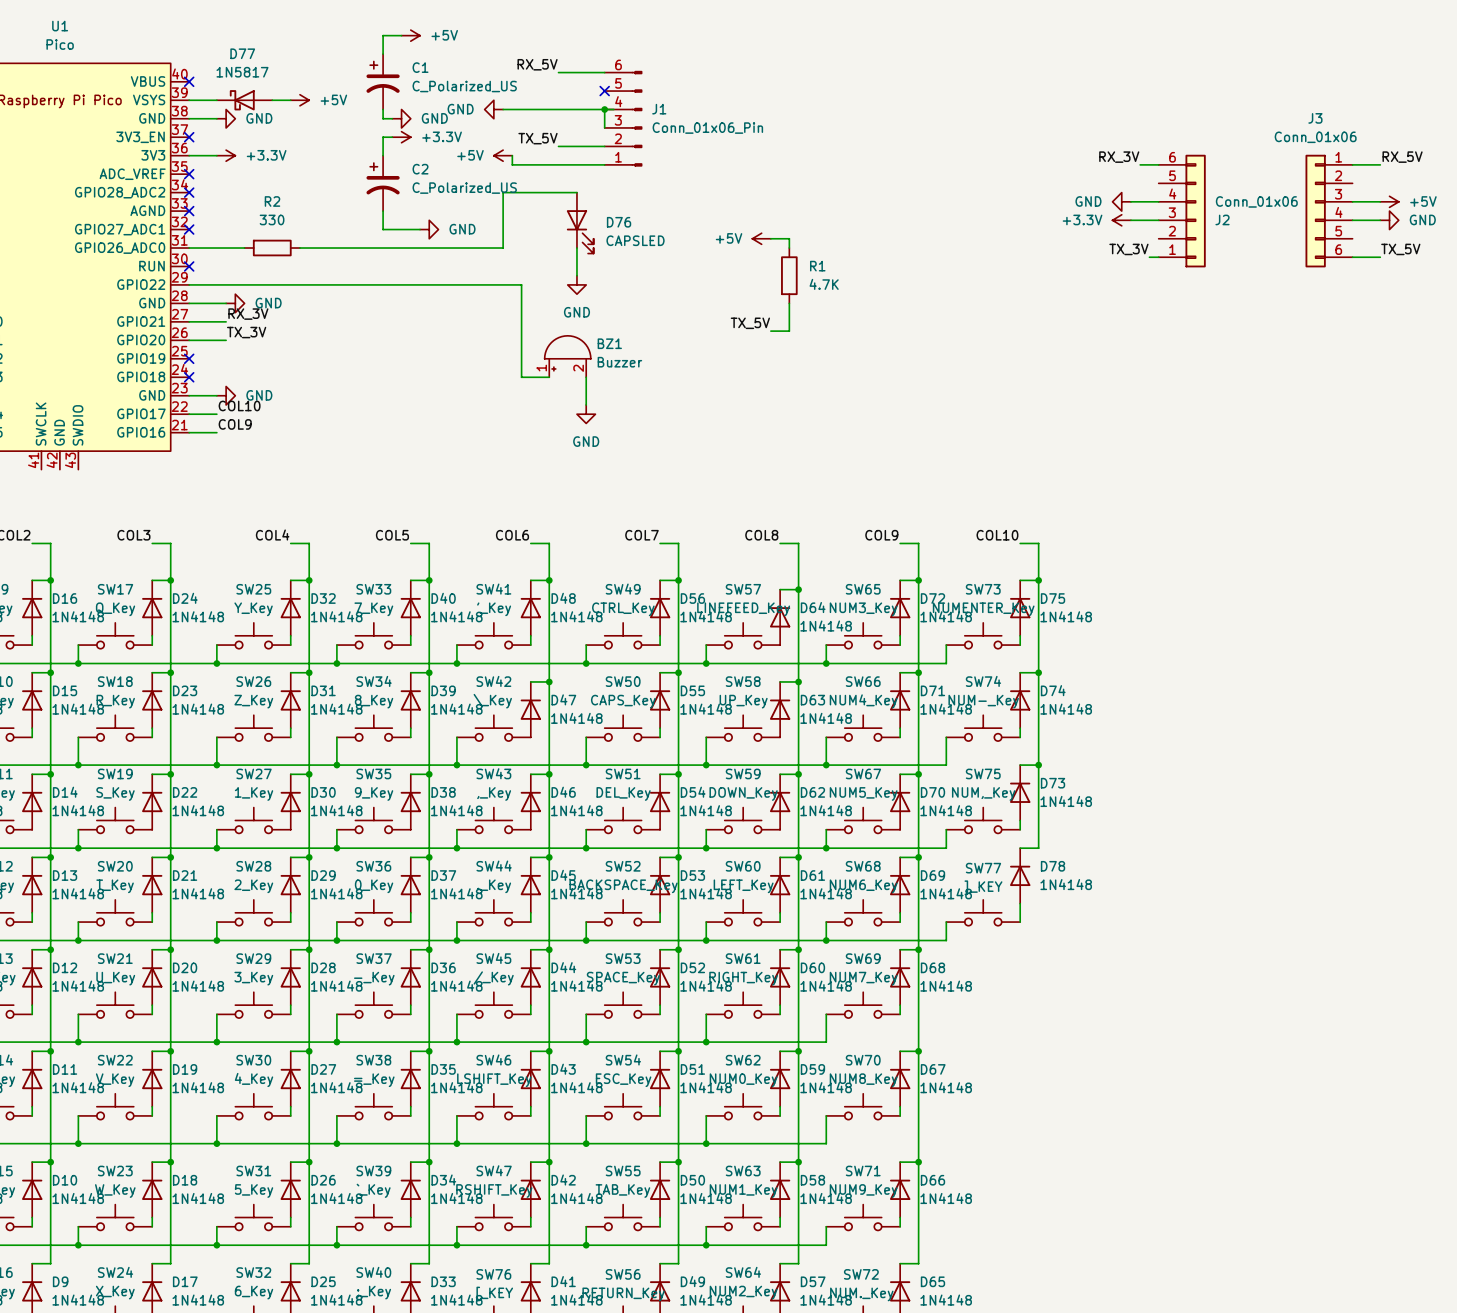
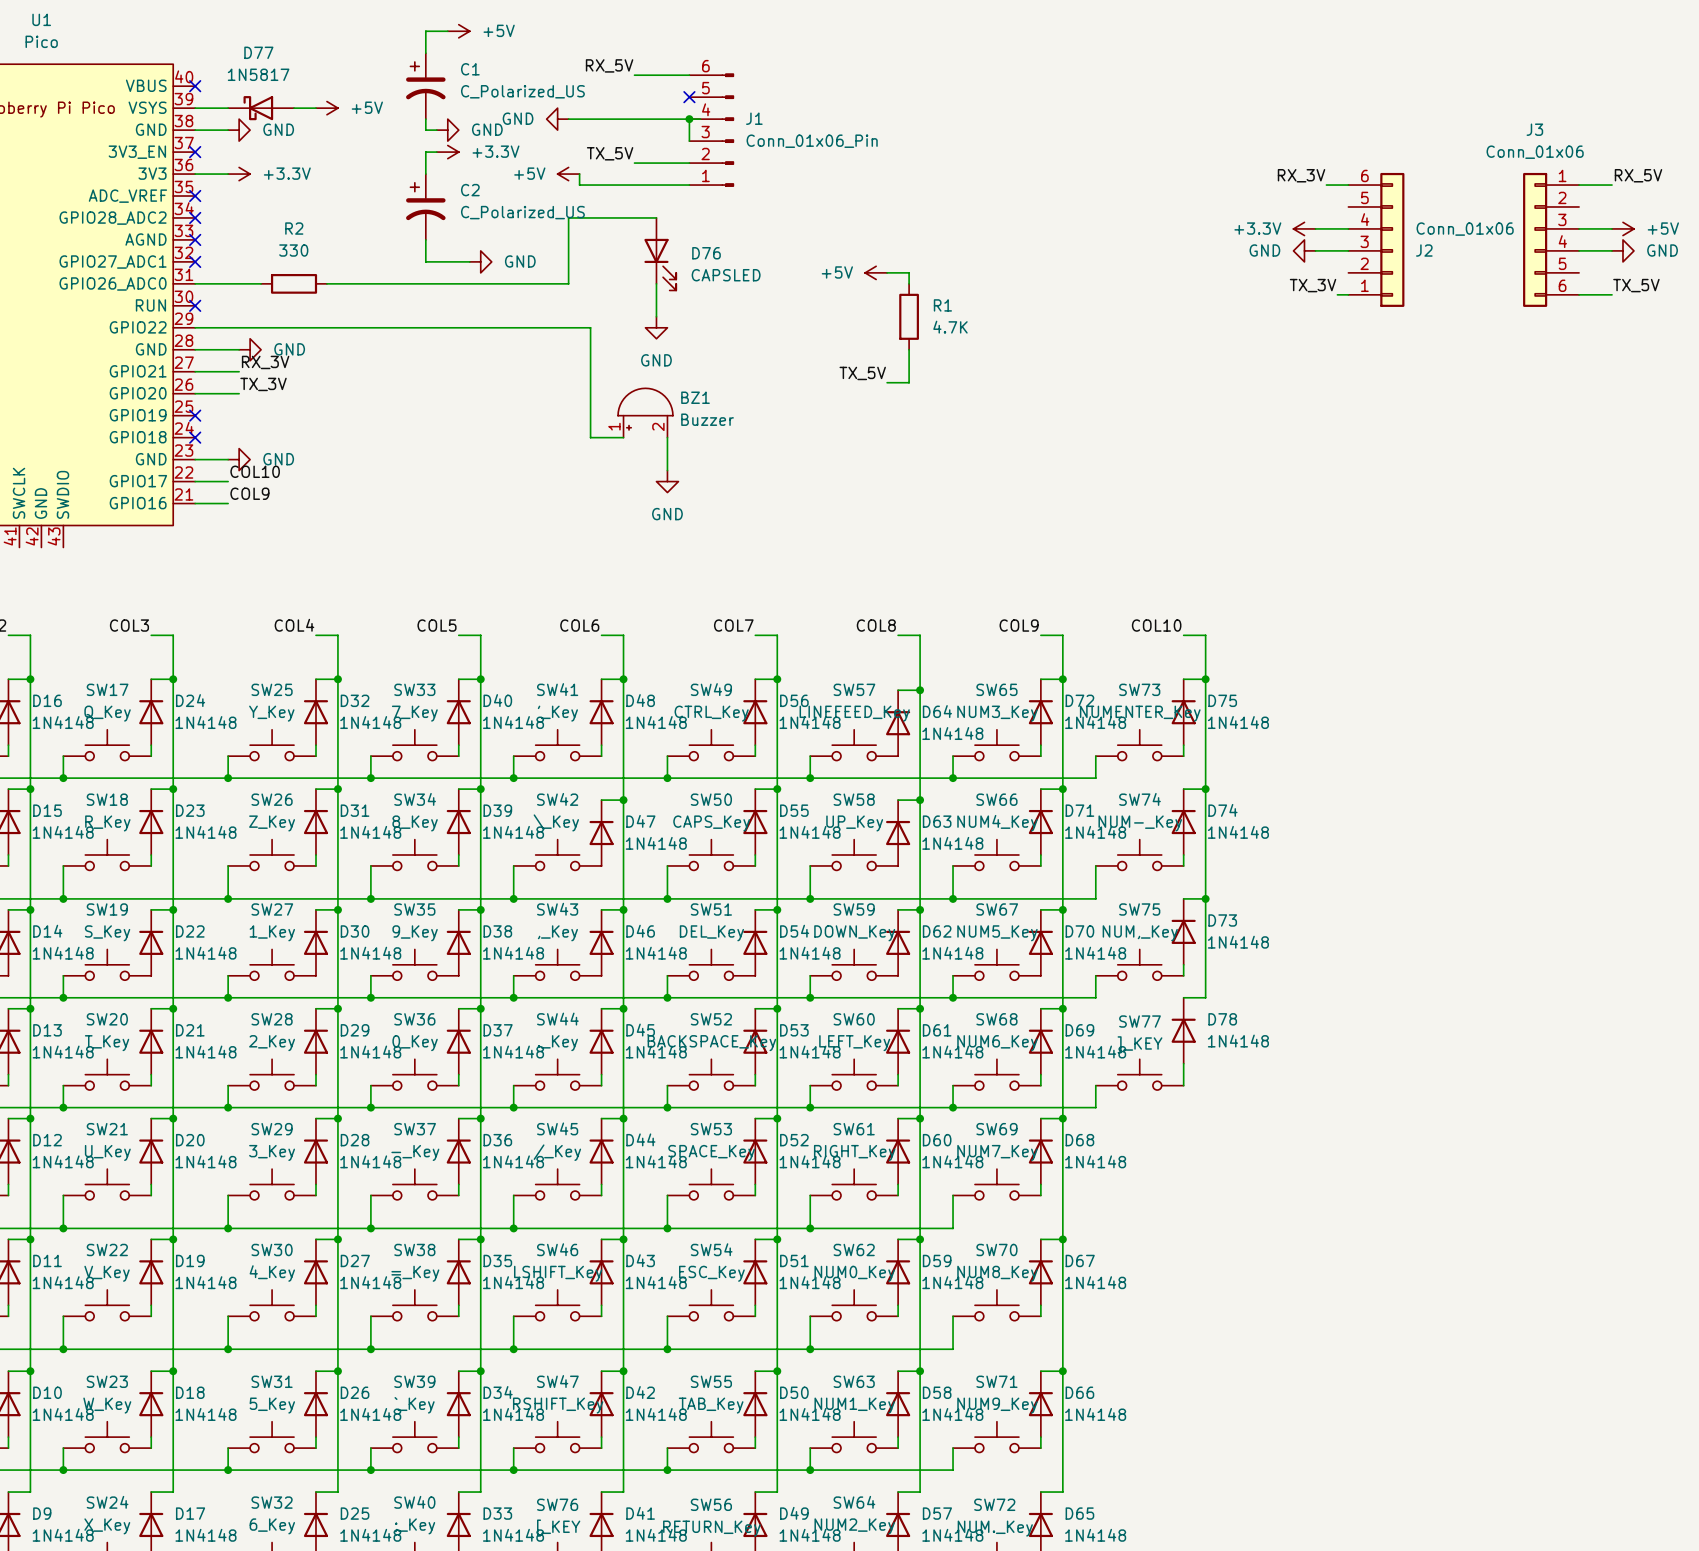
power symbol: GND (1121, 201) -> +3.3V (1304, 228)
power symbol: +3.3V (1121, 220) -> GND (1304, 250)

